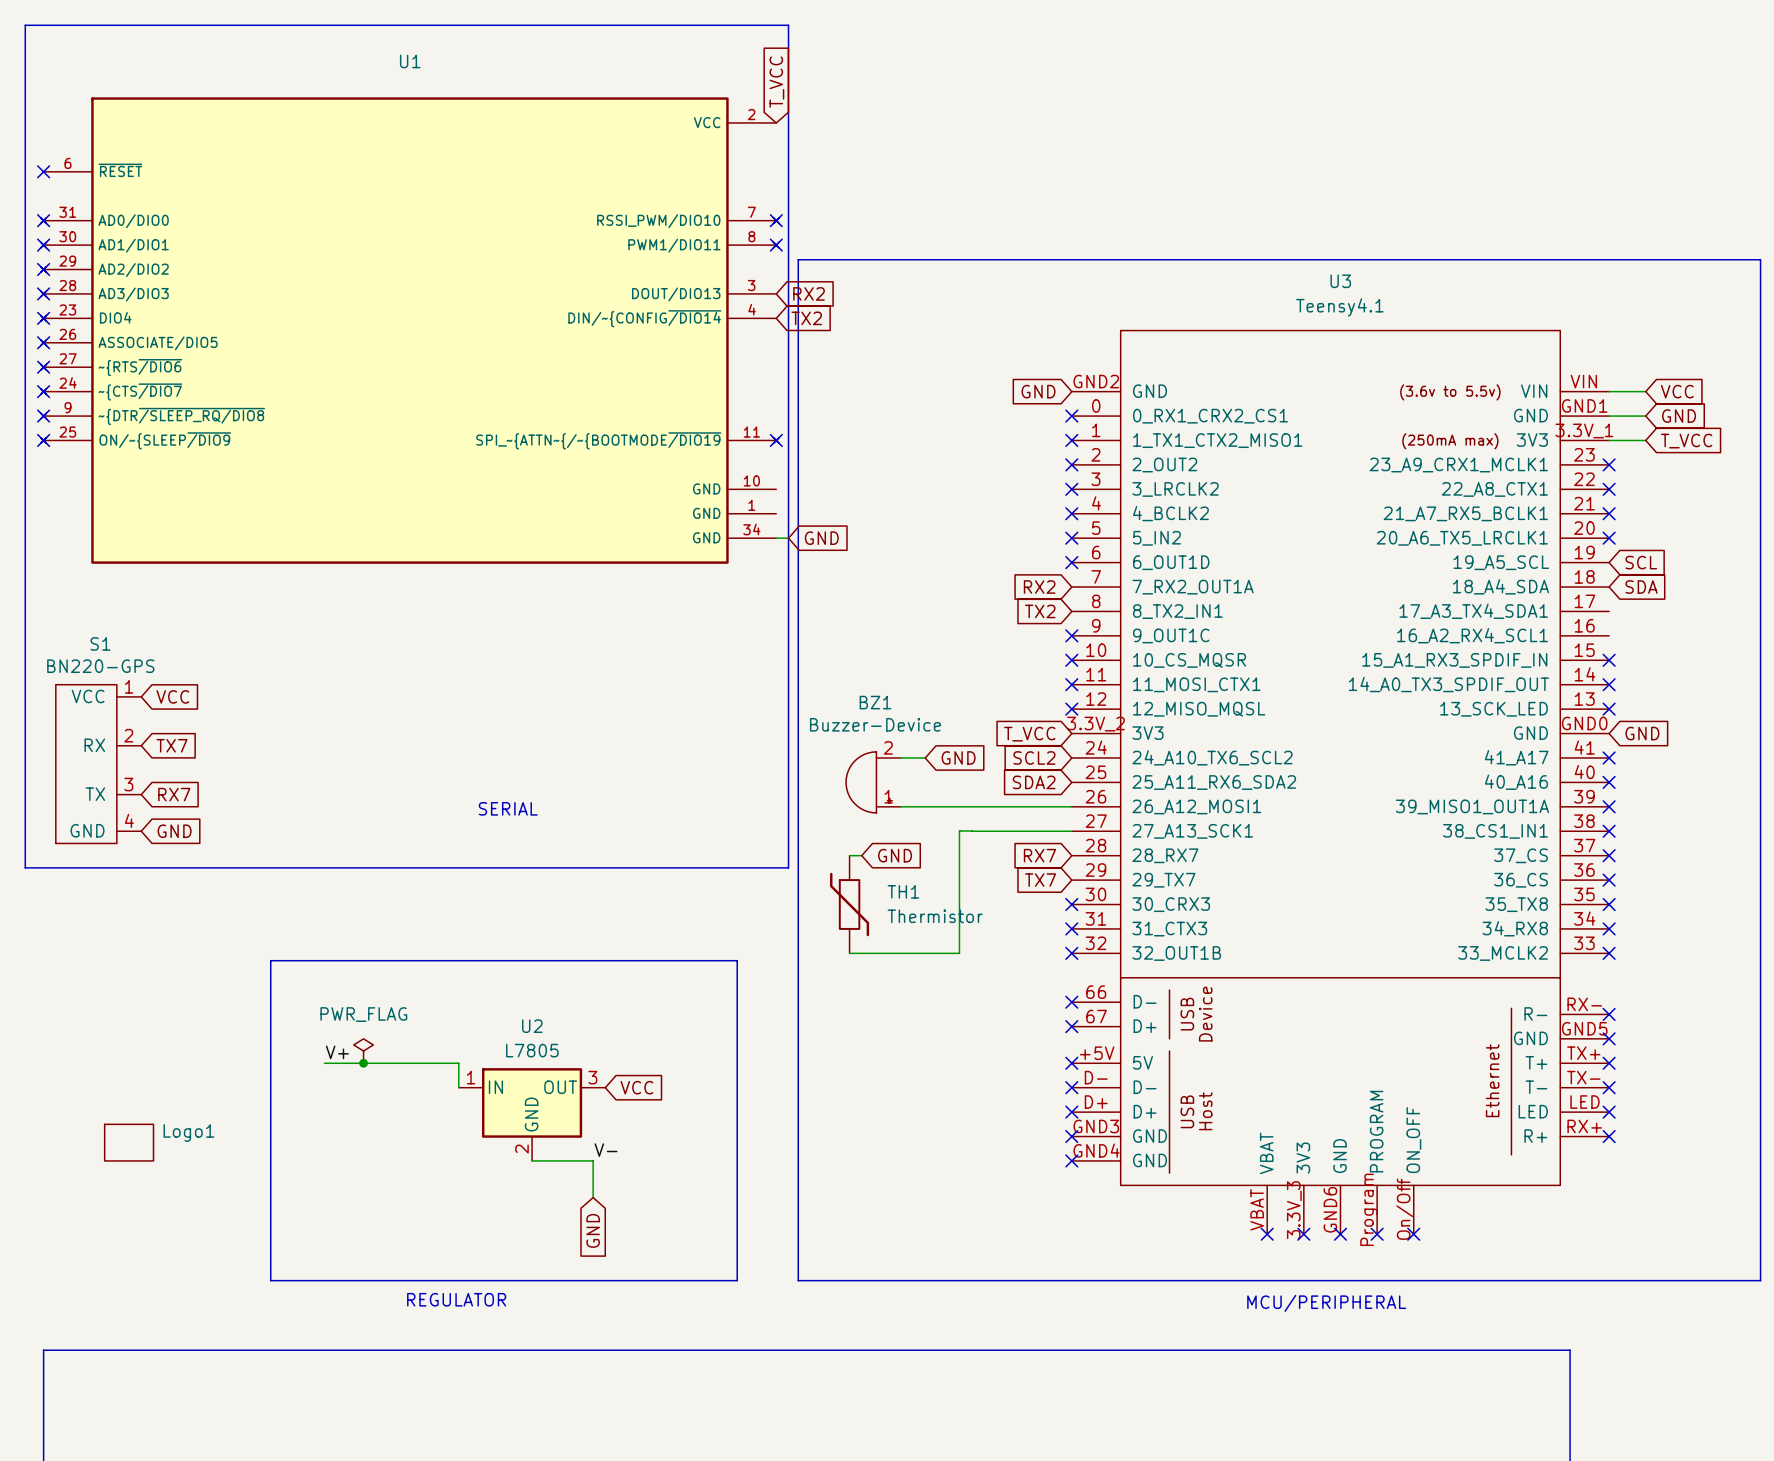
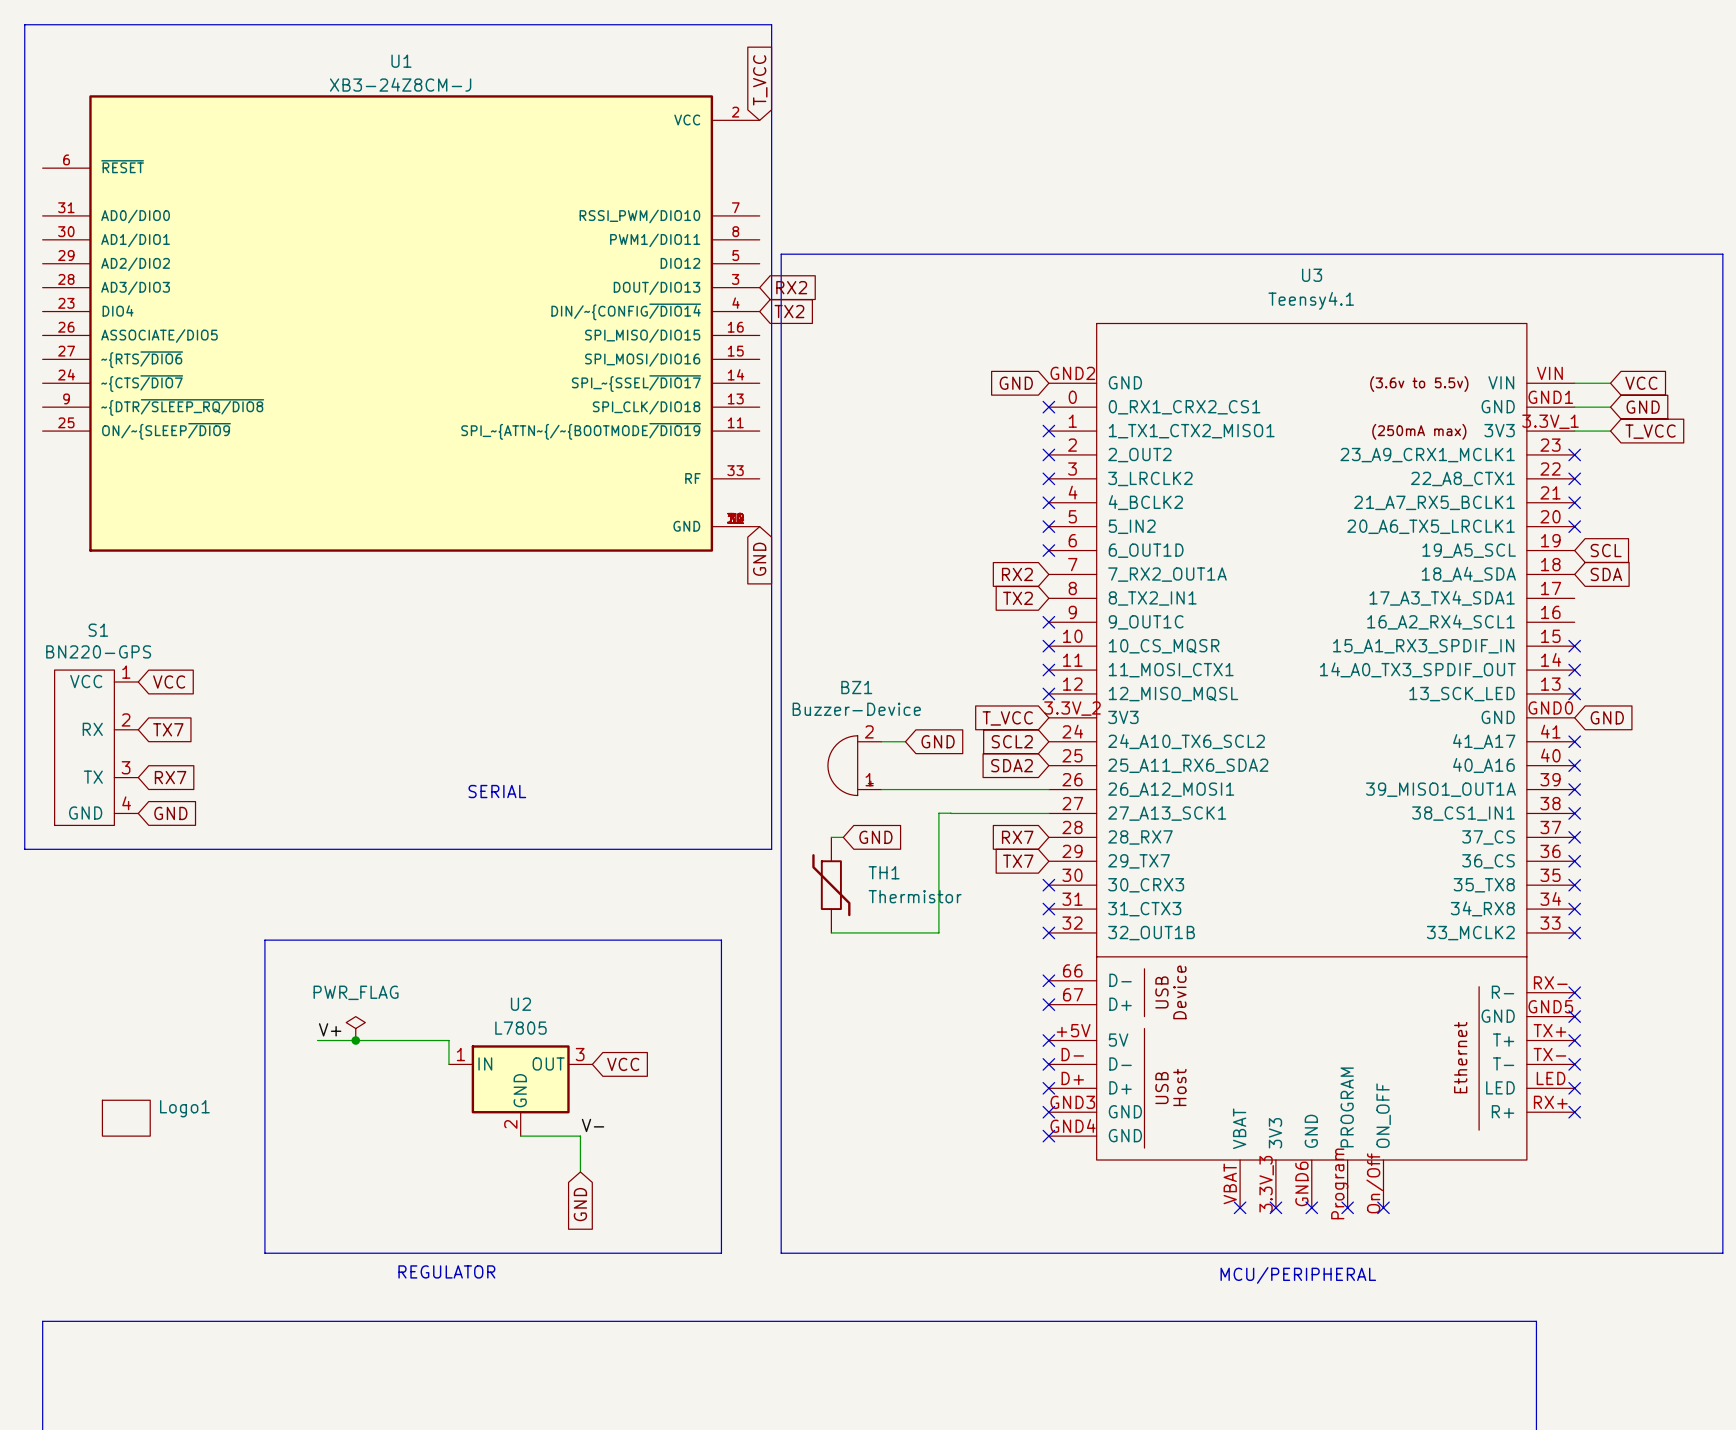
U1 value: none -> XB3-24Z8CM-J (400, 84)
U1 symbol: [40, 97, 780, 564] -> [42, 95, 760, 552]
no-connect mark: (43, 171) -> none
no-connect mark: (43, 220) -> none
no-connect mark: (776, 220) -> none
no-connect mark: (43, 245) -> none
no-connect mark: (776, 245) -> none
no-connect mark: (43, 269) -> none
no-connect mark: (43, 293) -> none
no-connect mark: (43, 318) -> none
no-connect mark: (43, 342) -> none
no-connect mark: (43, 367) -> none
no-connect mark: (43, 391) -> none
no-connect mark: (43, 416) -> none
no-connect mark: (43, 440) -> none
no-connect mark: (776, 440) -> none
wire: (776, 538) (788, 538) -> none
global label rotation: 0° (821, 538) -> 90° clockwise (759, 559)

